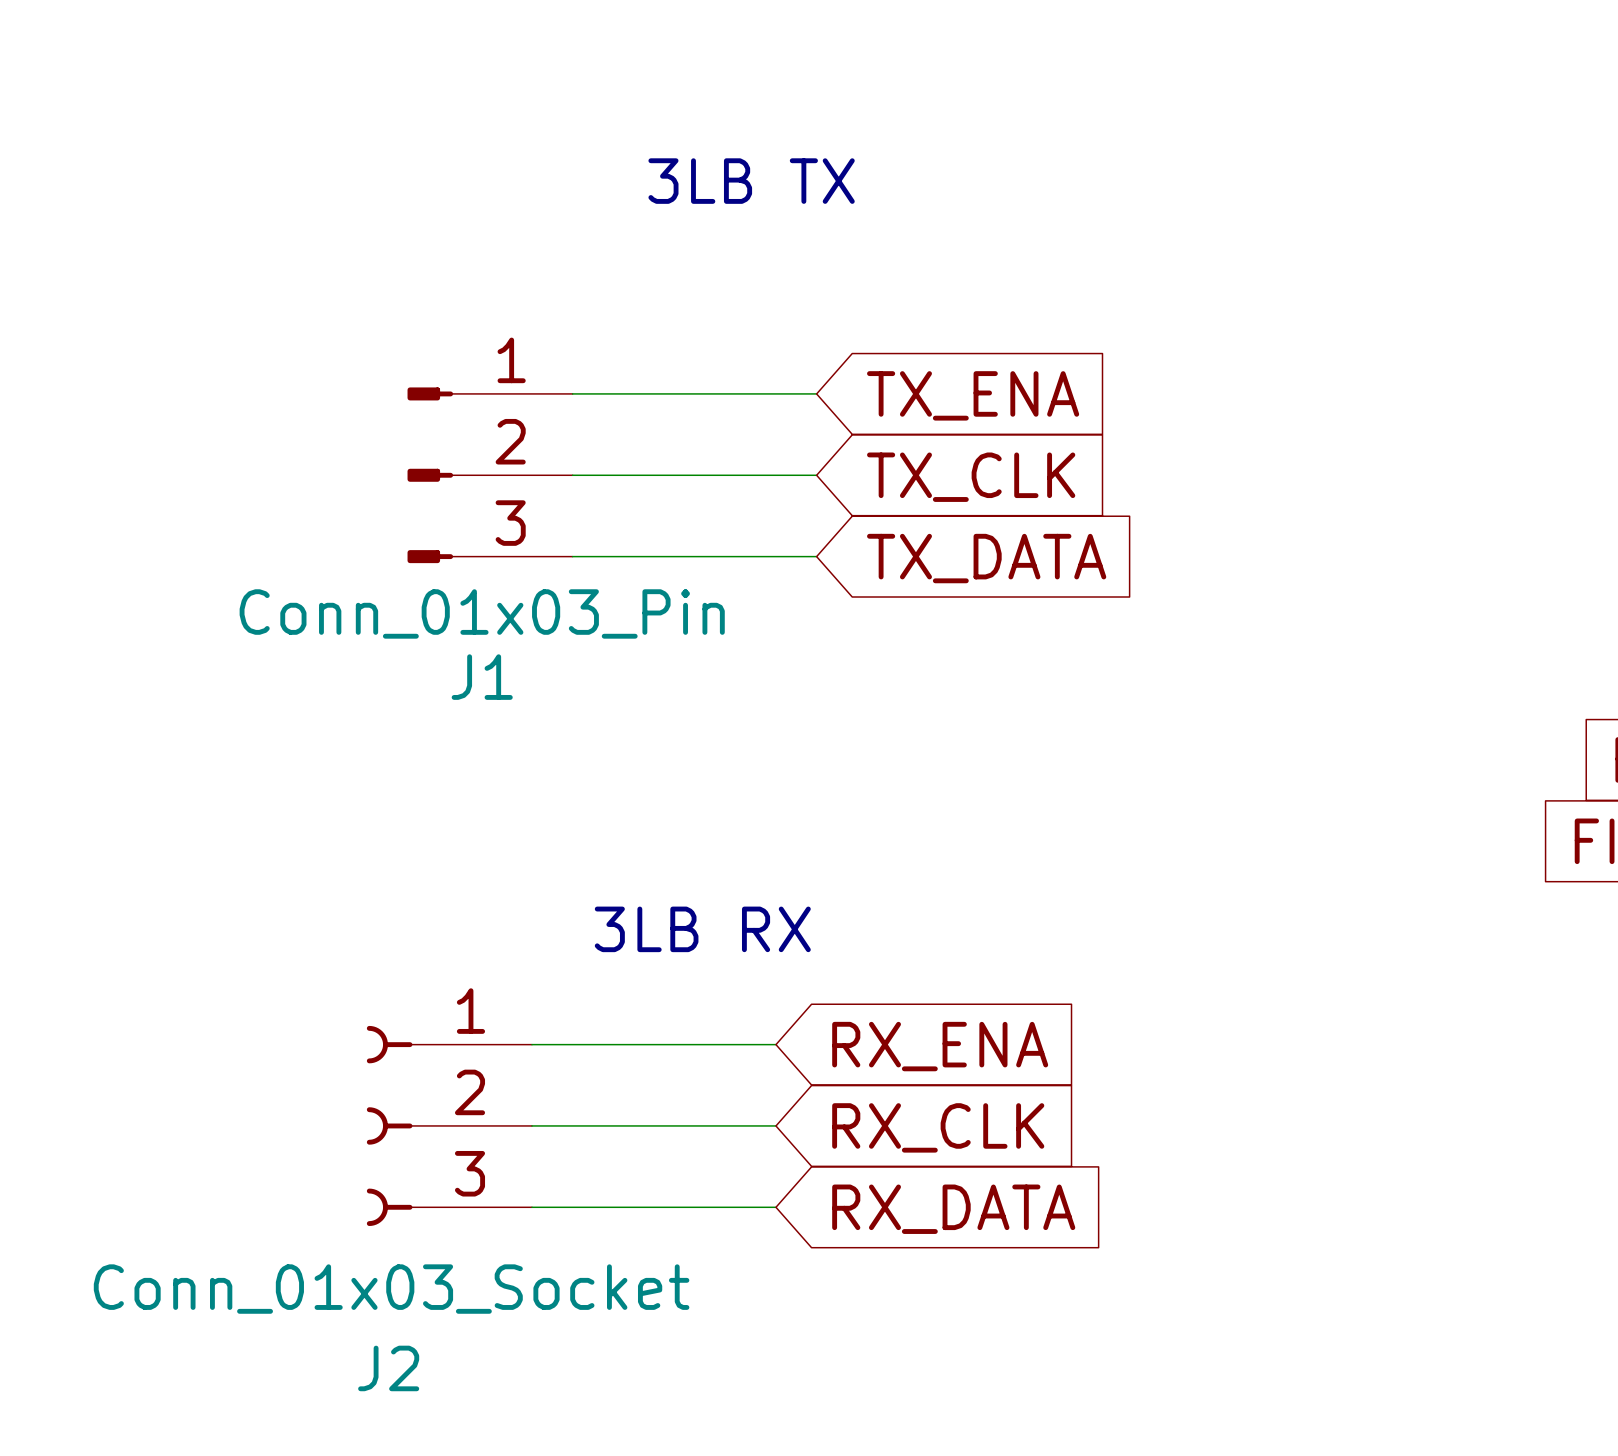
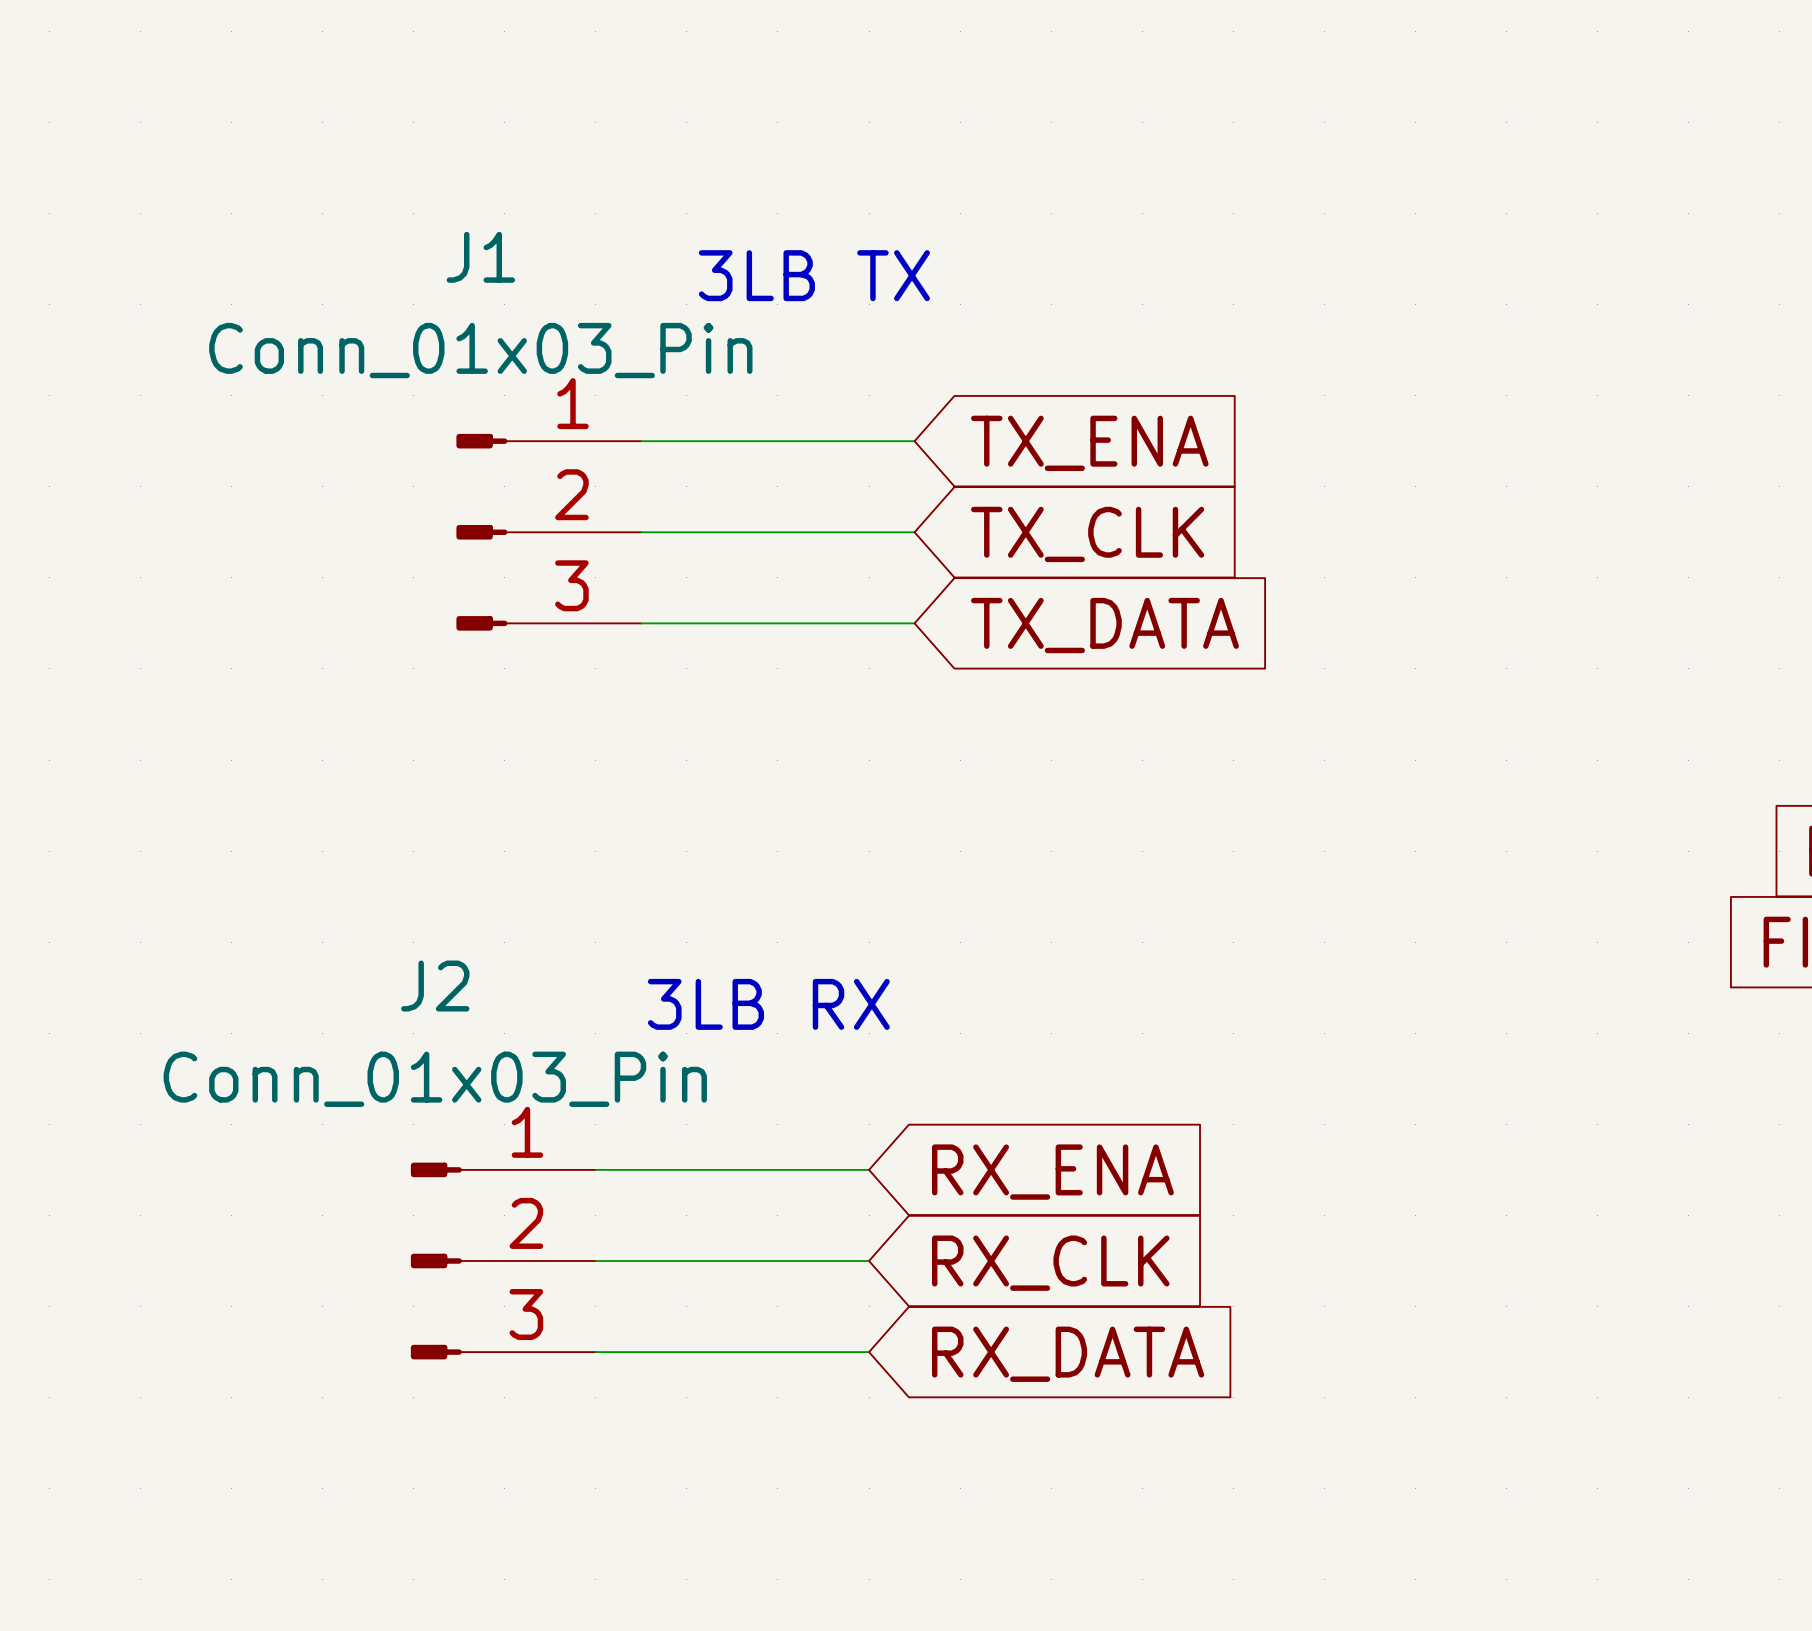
text position: 3LB TX (751, 181) -> 3LB TX (814, 275)
J1 value position: Conn_01x03_Pin (482, 613) -> Conn_01x03_Pin (480, 350)
J1 name position: J1 (482, 677) -> J1 (480, 257)
text position: 3LB RX (702, 929) -> 3LB RX (768, 1004)
J2 symbol: [366, 1025, 532, 1227] -> [410, 1162, 596, 1360]
J2 value: Conn_01x03_Socket (391, 1289) -> Conn_01x03_Pin (435, 1079)
J2 name position: J2 (388, 1368) -> J2 (435, 986)

